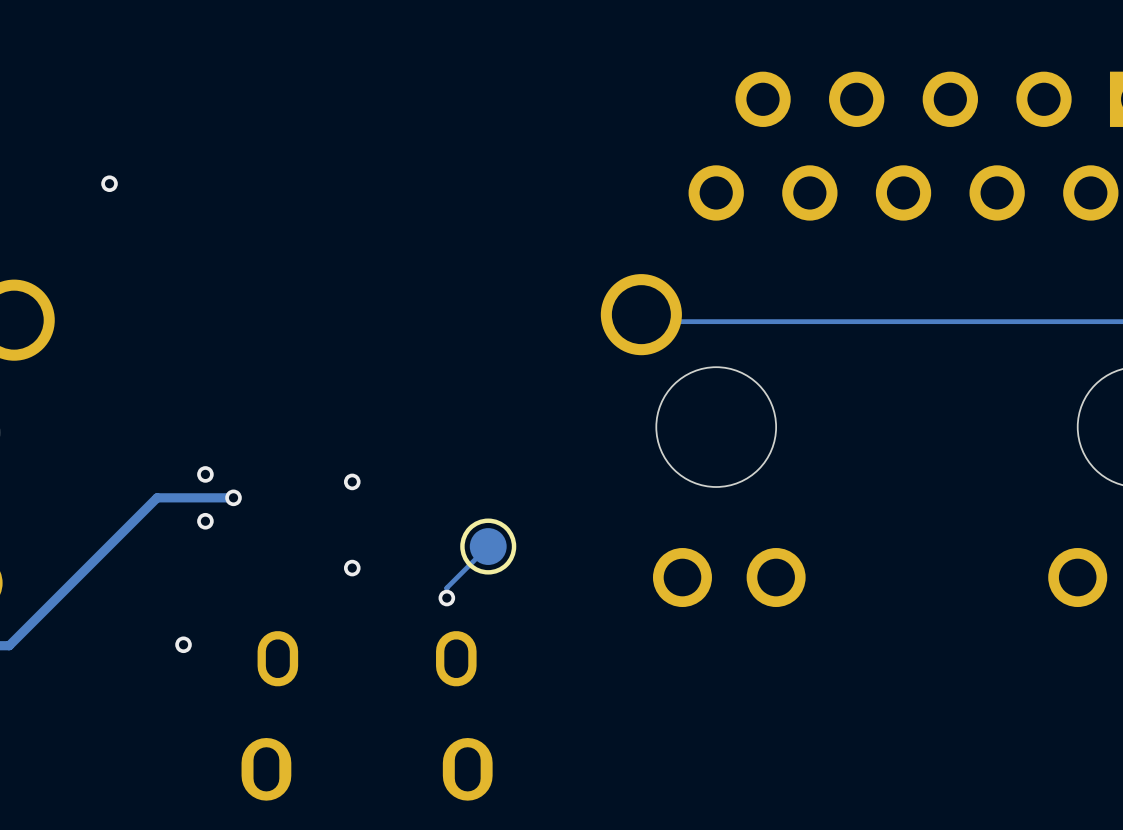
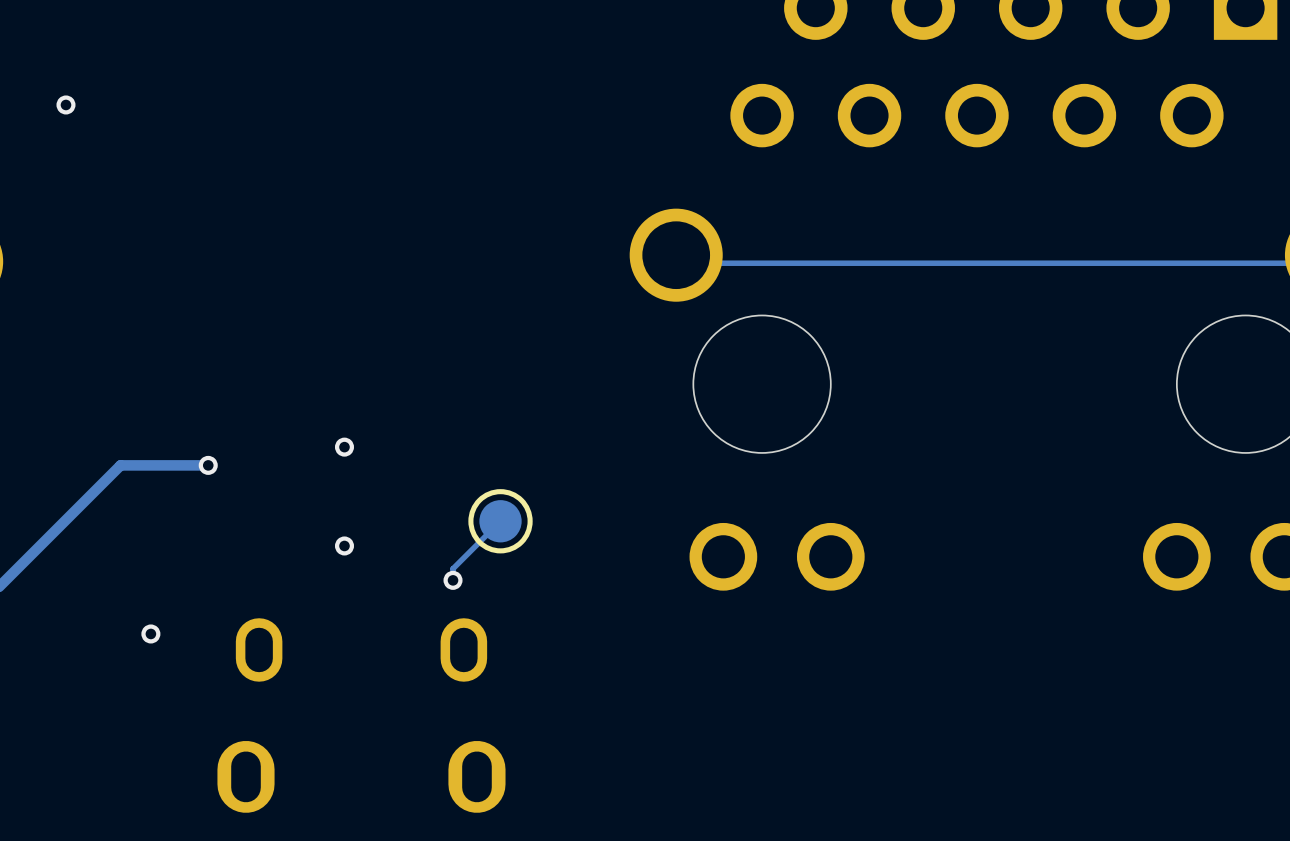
via: (205, 474) -> none
via: (205, 521) -> none

